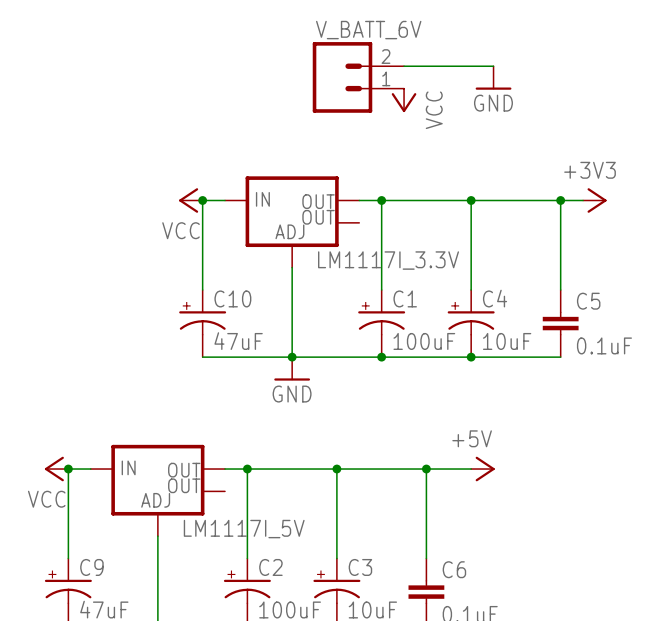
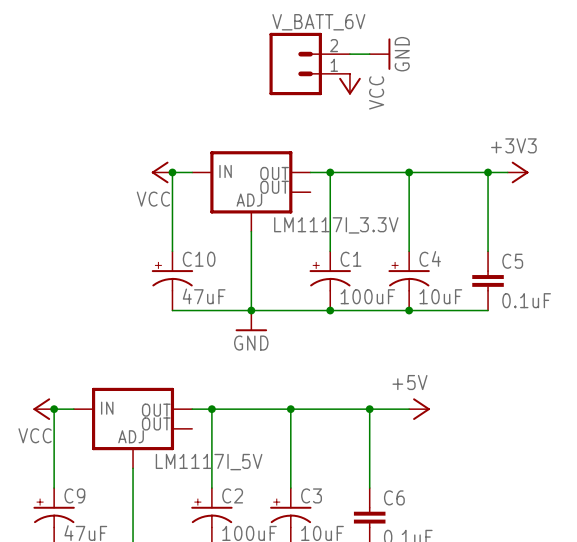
wire: (426, 66) (493, 66) -> none
power symbol position: GND (493, 77) -> GND (380, 54)
power symbol rotation: 0° (493, 88) -> 90° counterclockwise (389, 54)

